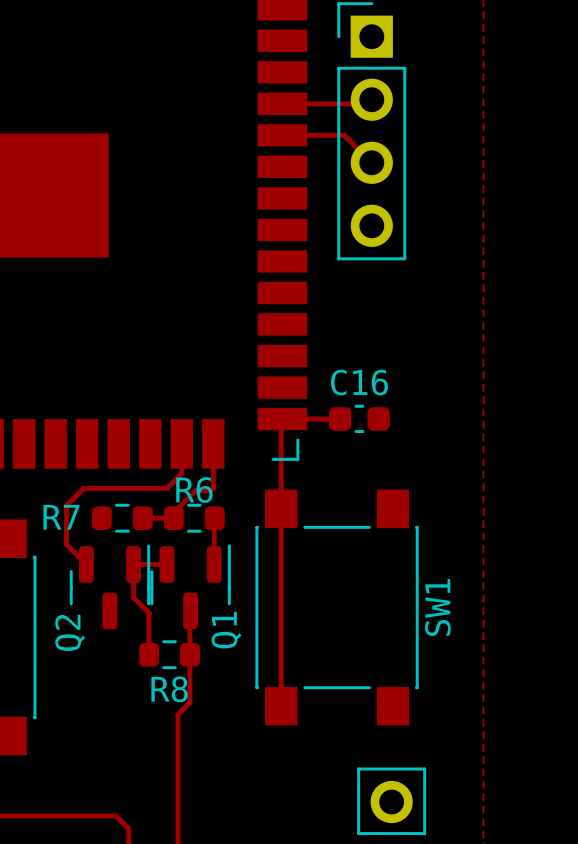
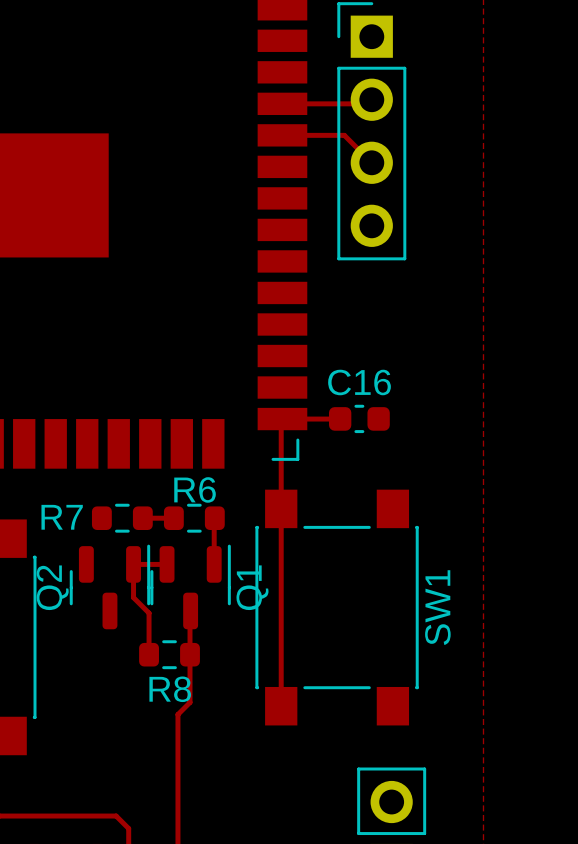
track: (181, 443) (181, 473) (167, 488) (83, 488) (66, 505) (66, 544) (86, 564) -> none
track: (213, 443) (213, 488) (210, 490) (195, 490) (173, 512) (173, 518) -> none
Q1 name position: Q1 (226, 630) -> Q1 (252, 587)
Q2 name position: Q2 (70, 632) -> Q2 (52, 587)

